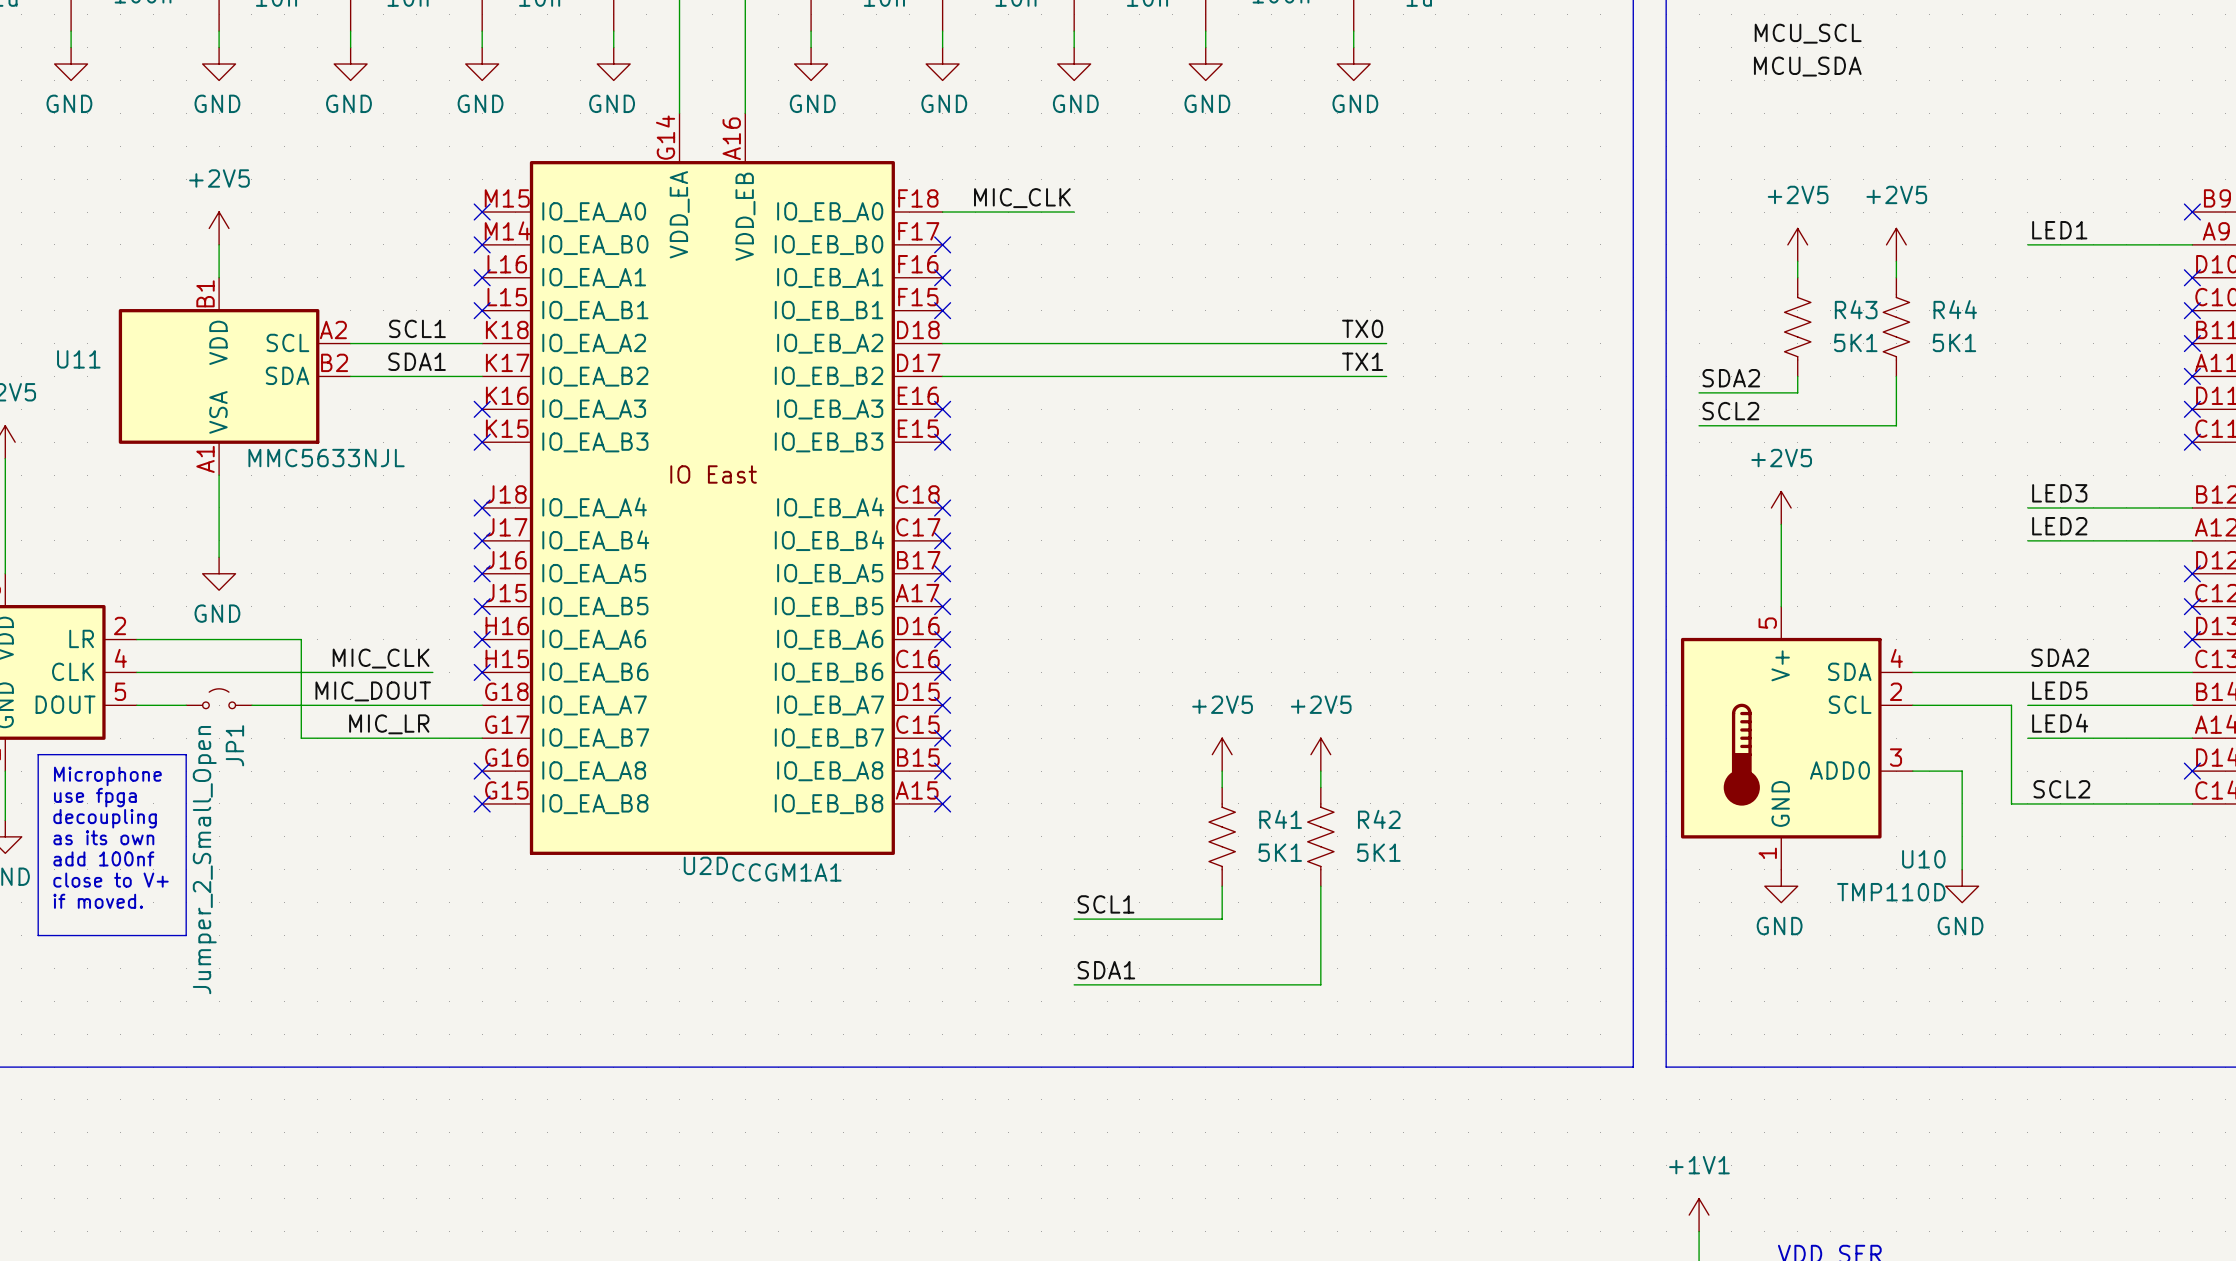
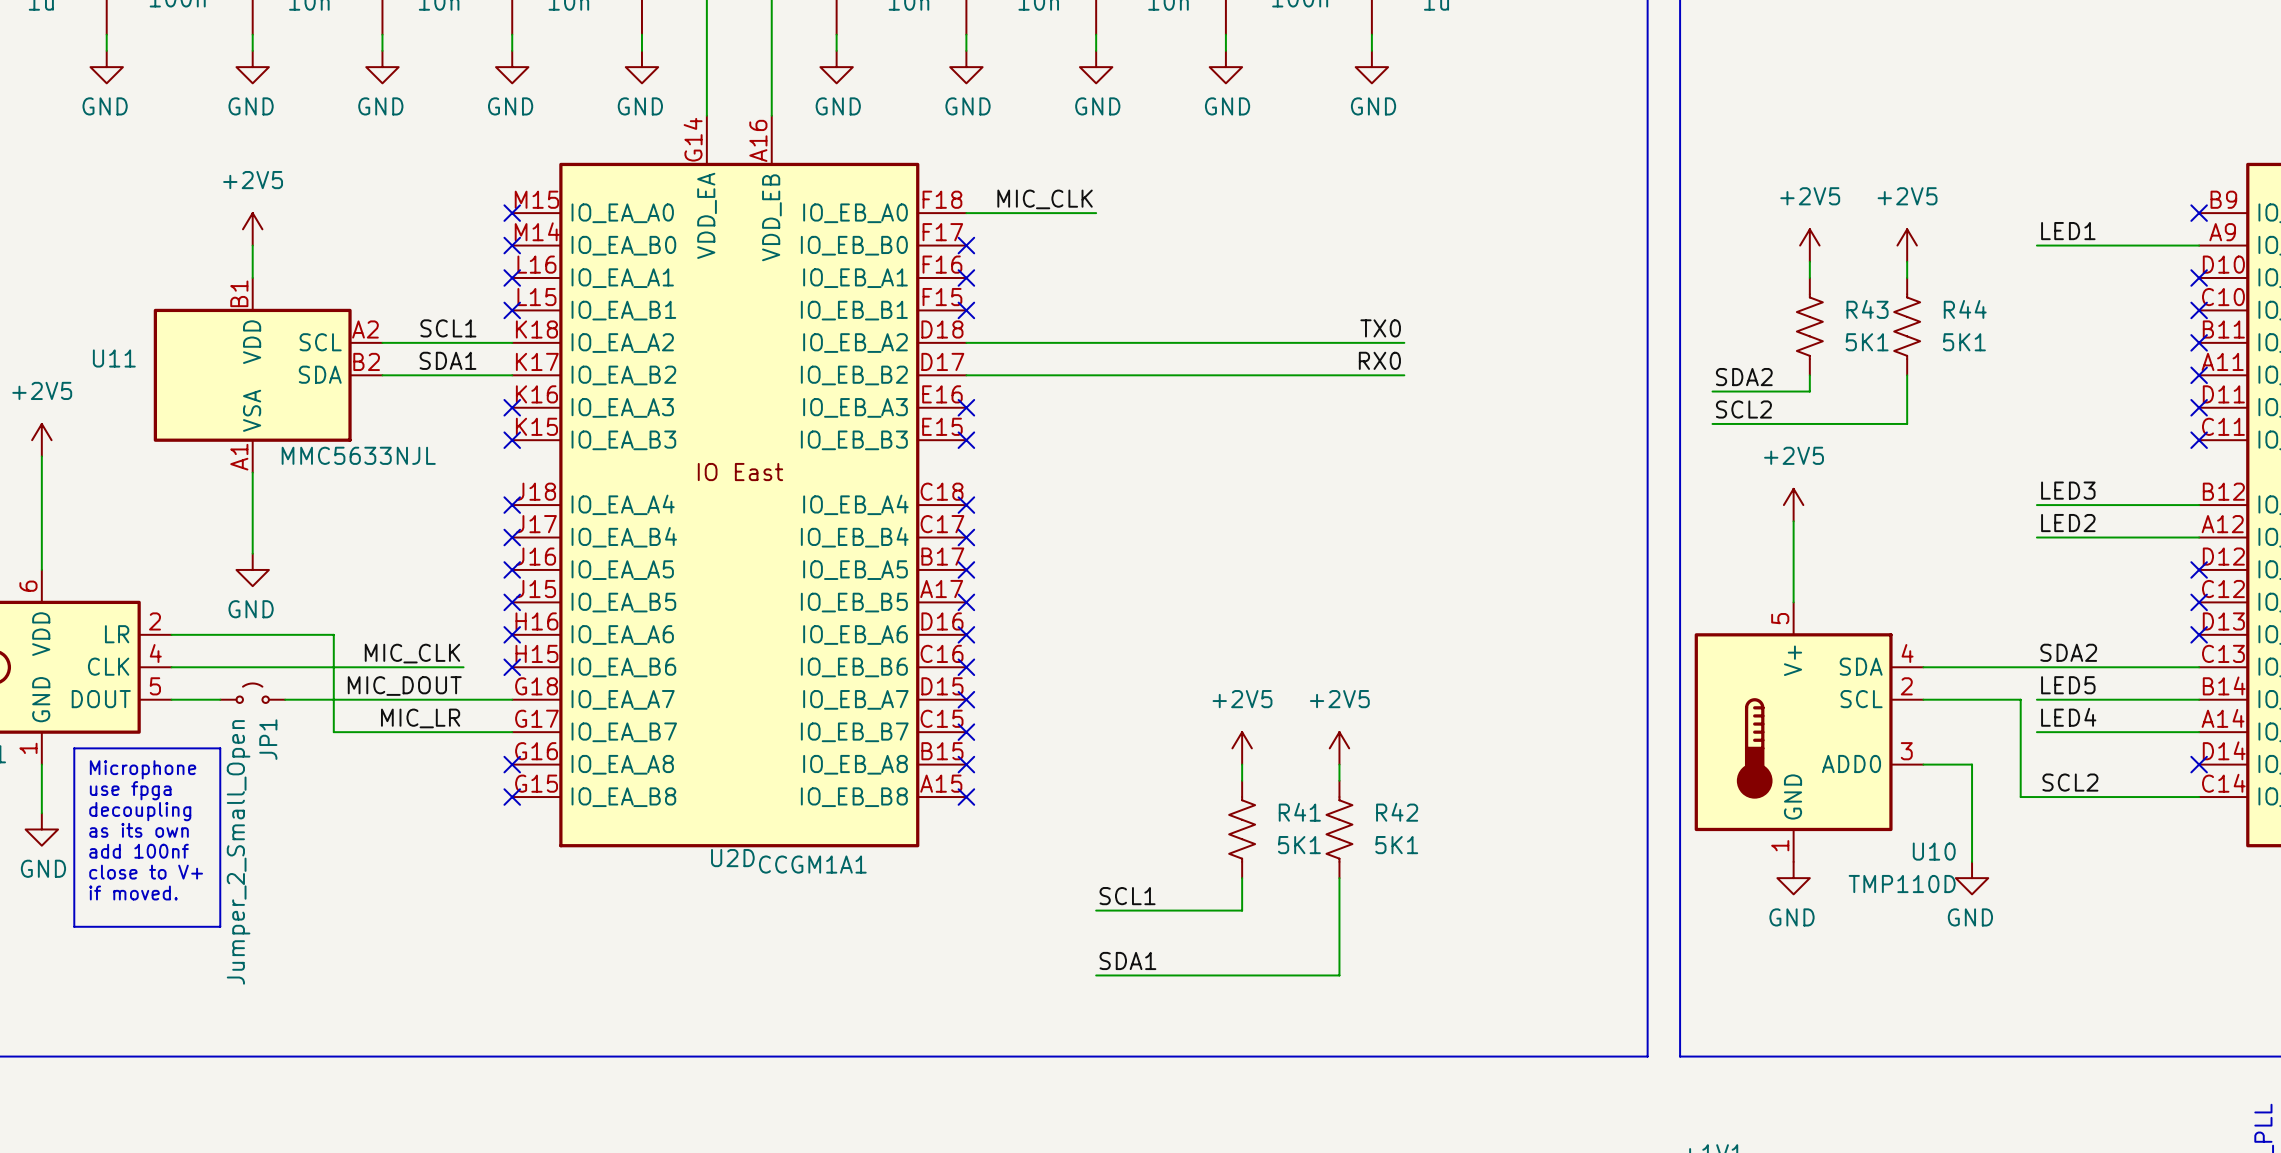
label: MCU_SCL (1808, 33) -> none
label: MCU_SDA (1807, 66) -> none
label: TX1 (1362, 361) -> RX0 (1379, 360)

